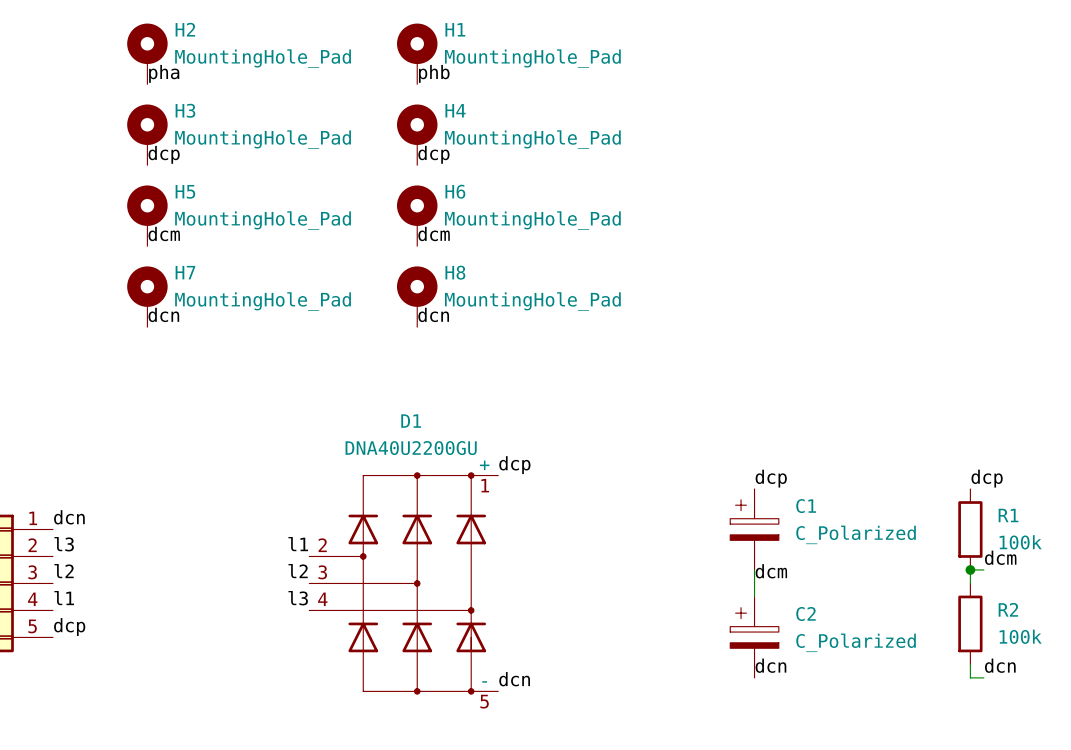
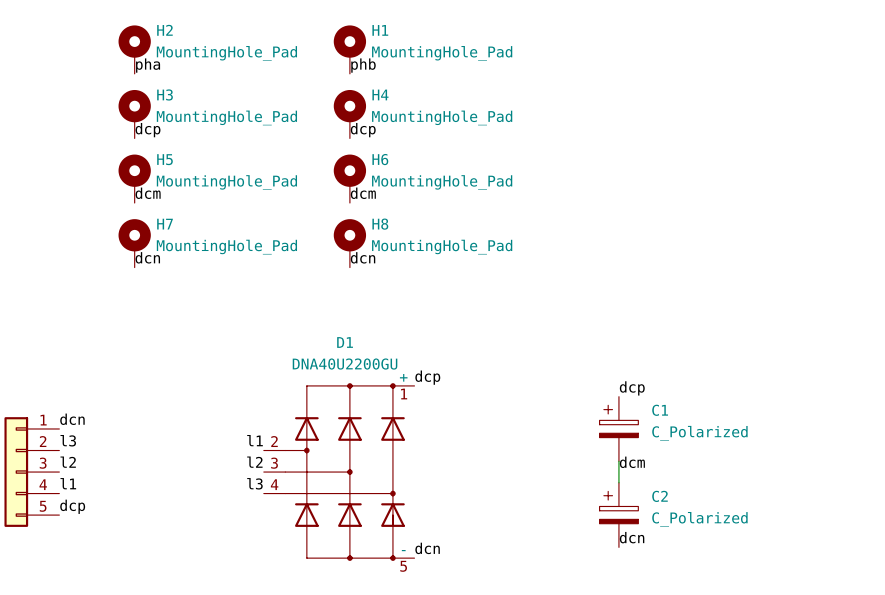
label: dcp (987, 478) -> none
R1: 100k (970, 529) -> none
label: dcm (1000, 557) -> none
junction: (970, 569) -> none
wire: (983, 569) (970, 569) (970, 583) -> none
R2: 100k (970, 623) -> none
wire: (970, 664) (970, 677) (983, 677) -> none
label: dcn (1000, 665) -> none

